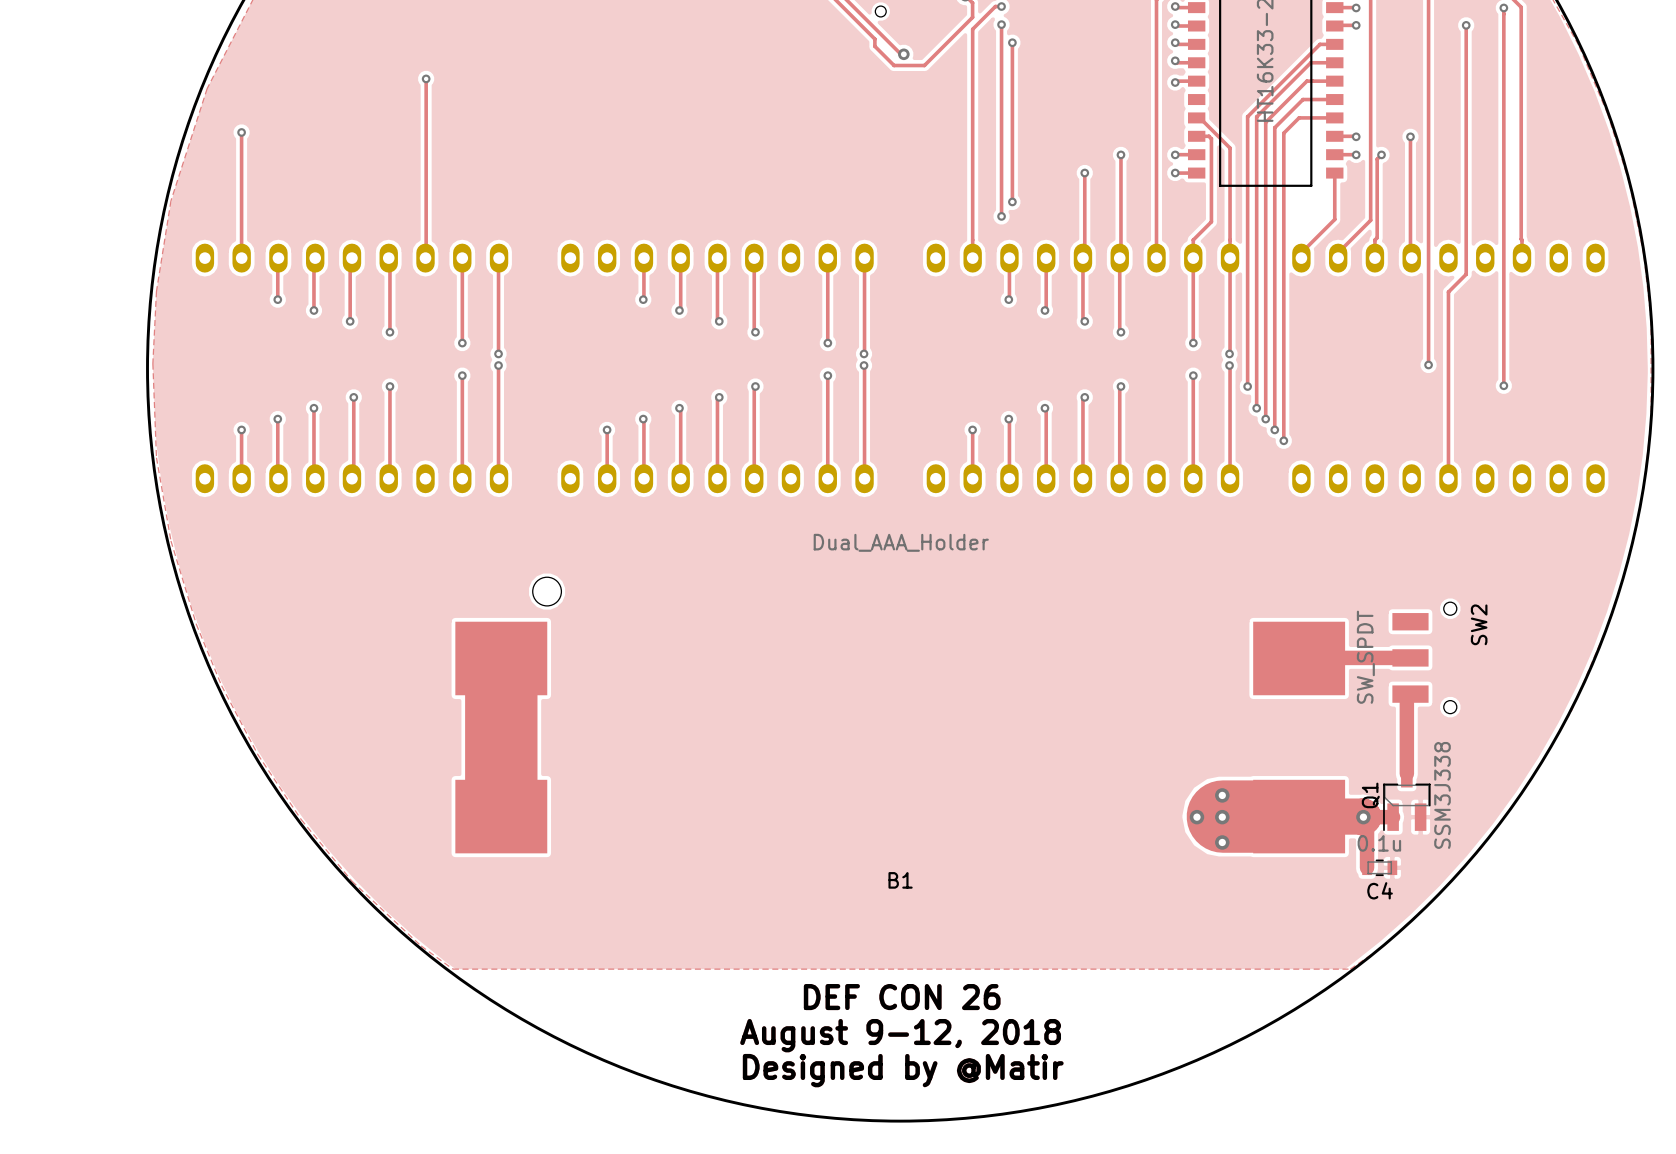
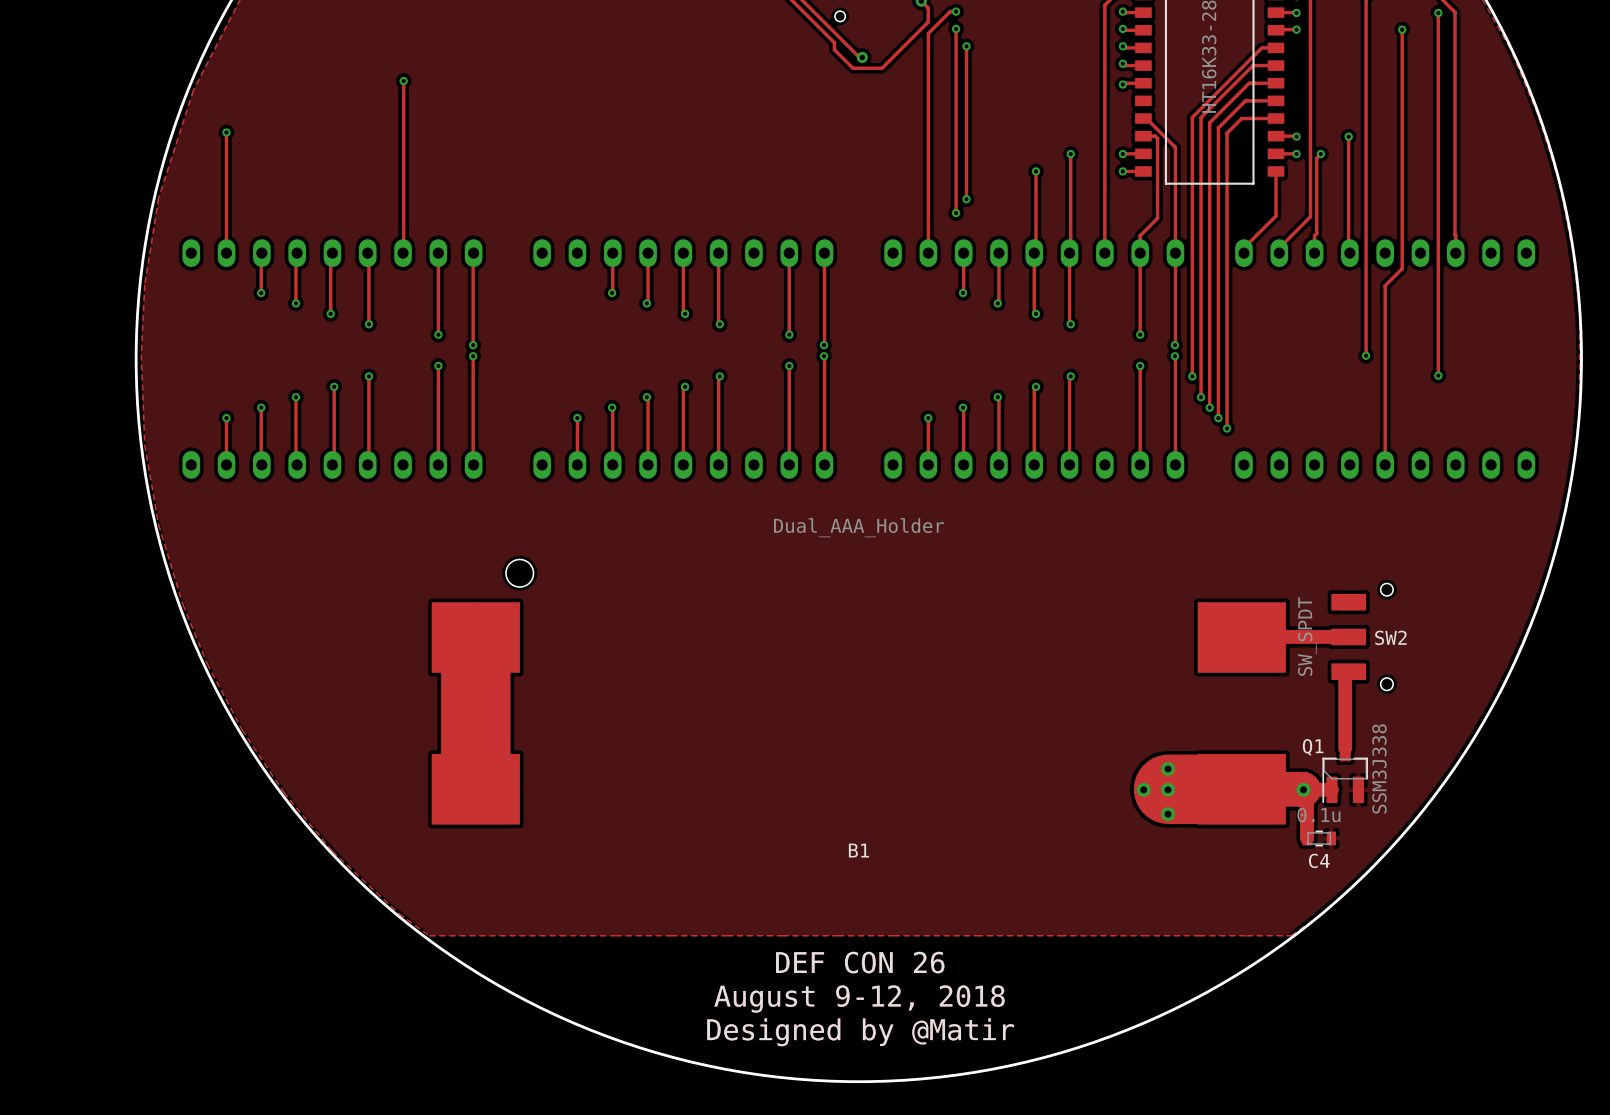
SW2 name rotation: 0° (1479, 624) -> 90° clockwise (1390, 637)
Q1 name rotation: 0° (1370, 795) -> 90° clockwise (1313, 747)

